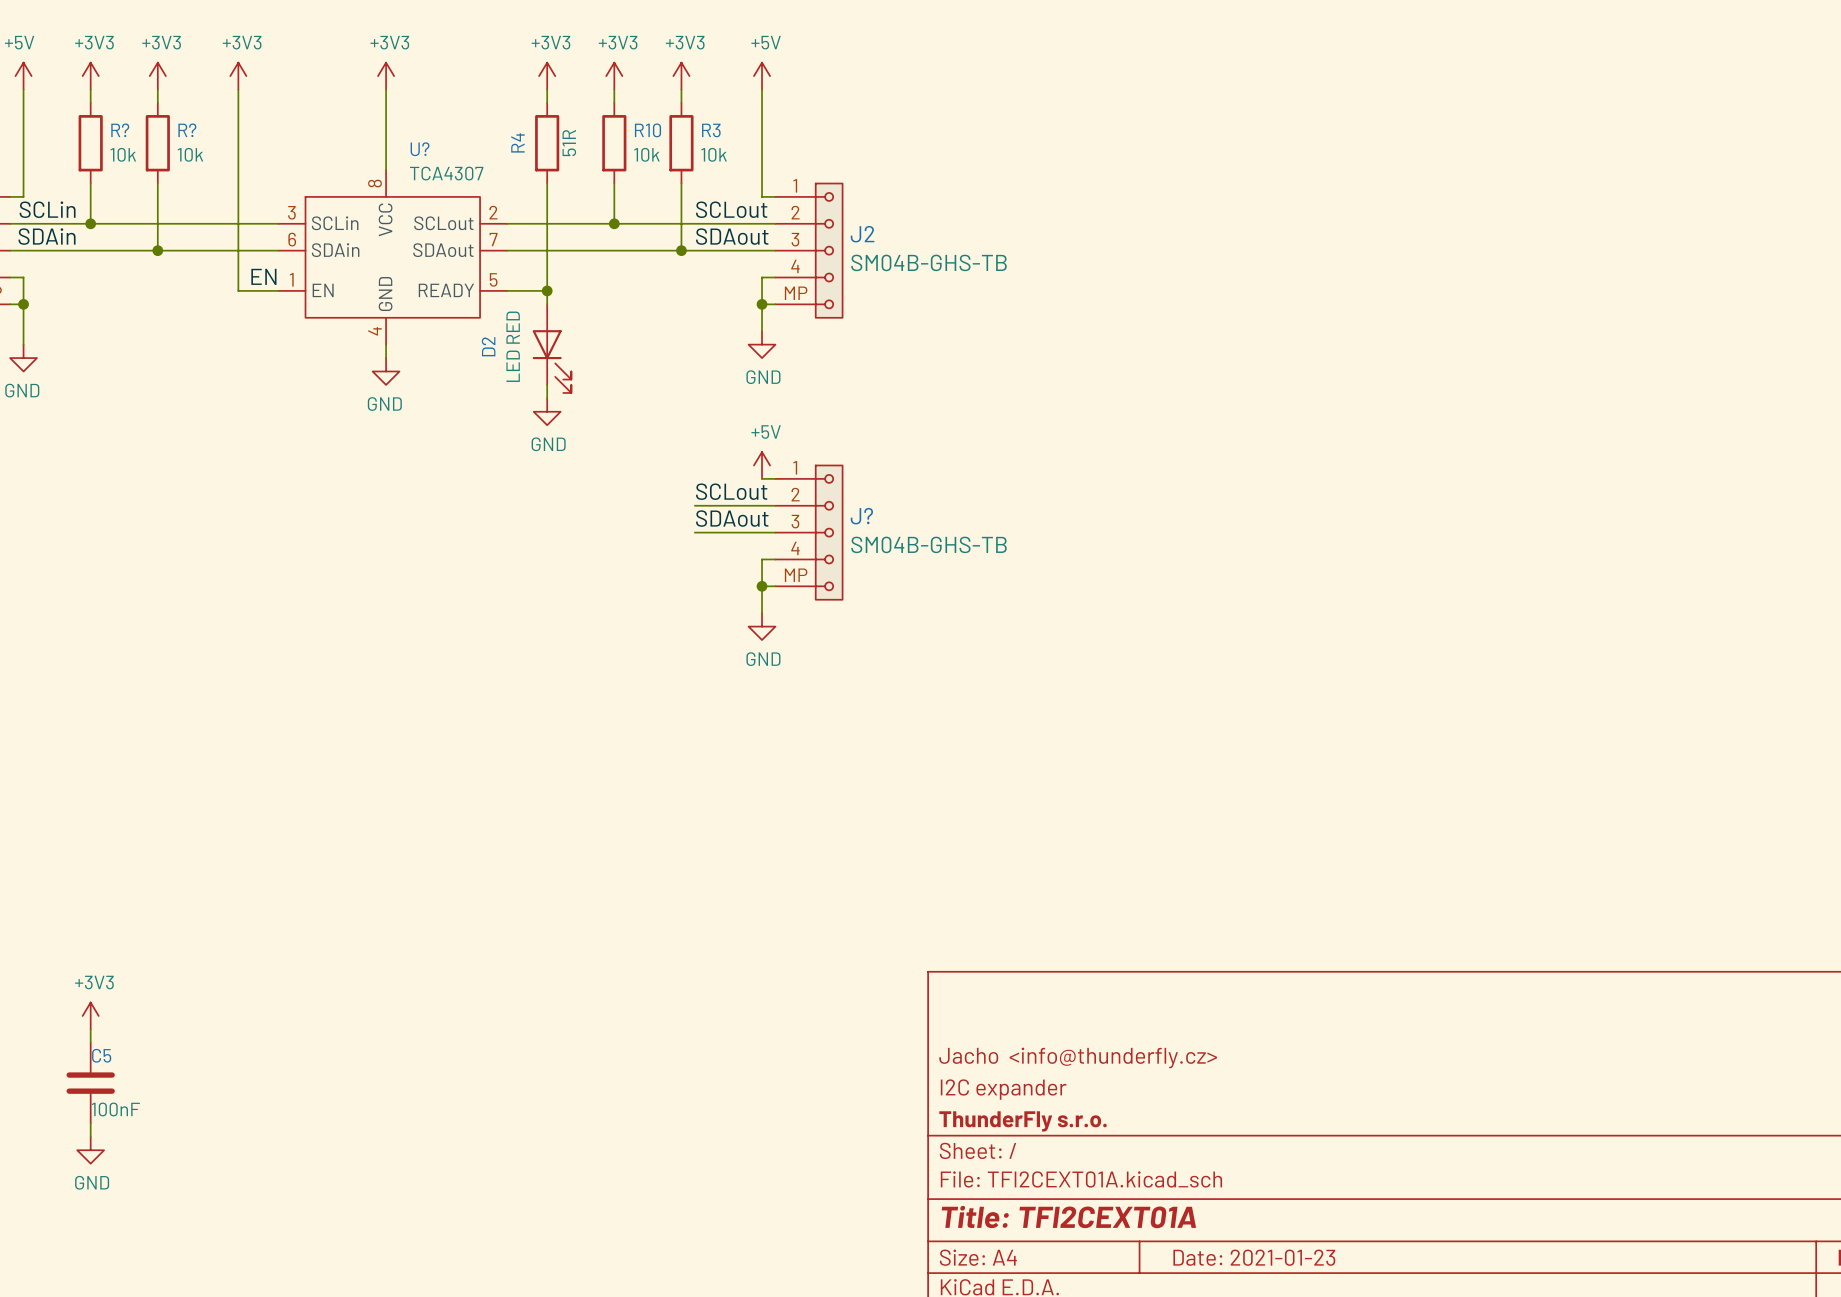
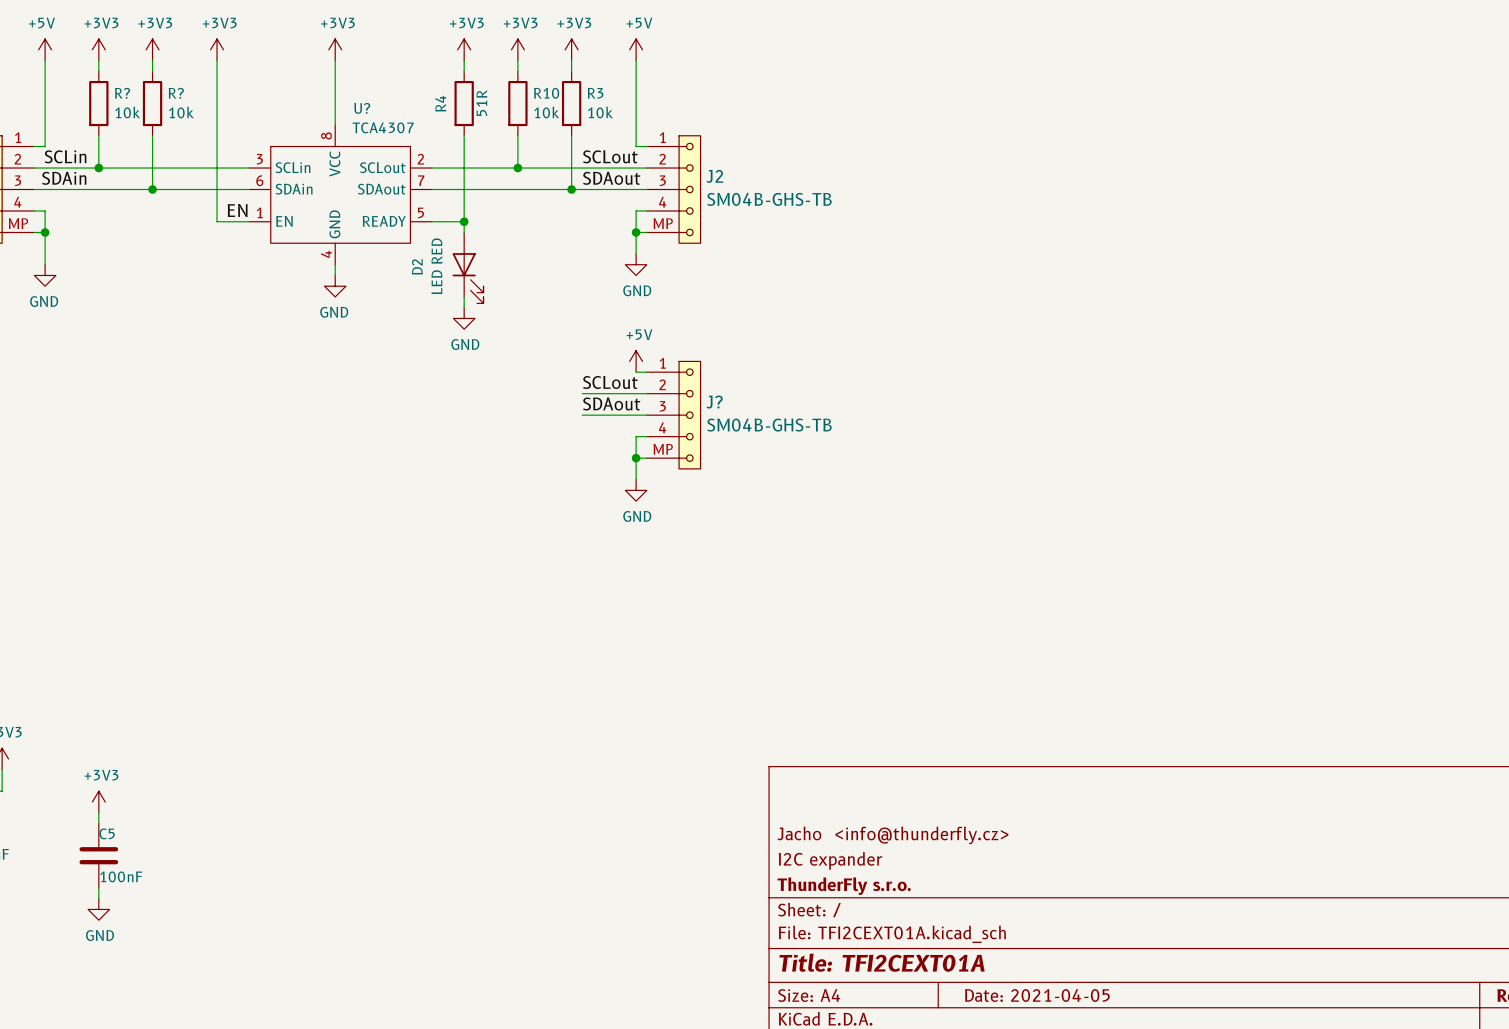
title block: Date: 2021-01-23 (1254, 1257) -> Date: 2021-04-05 (1037, 995)

